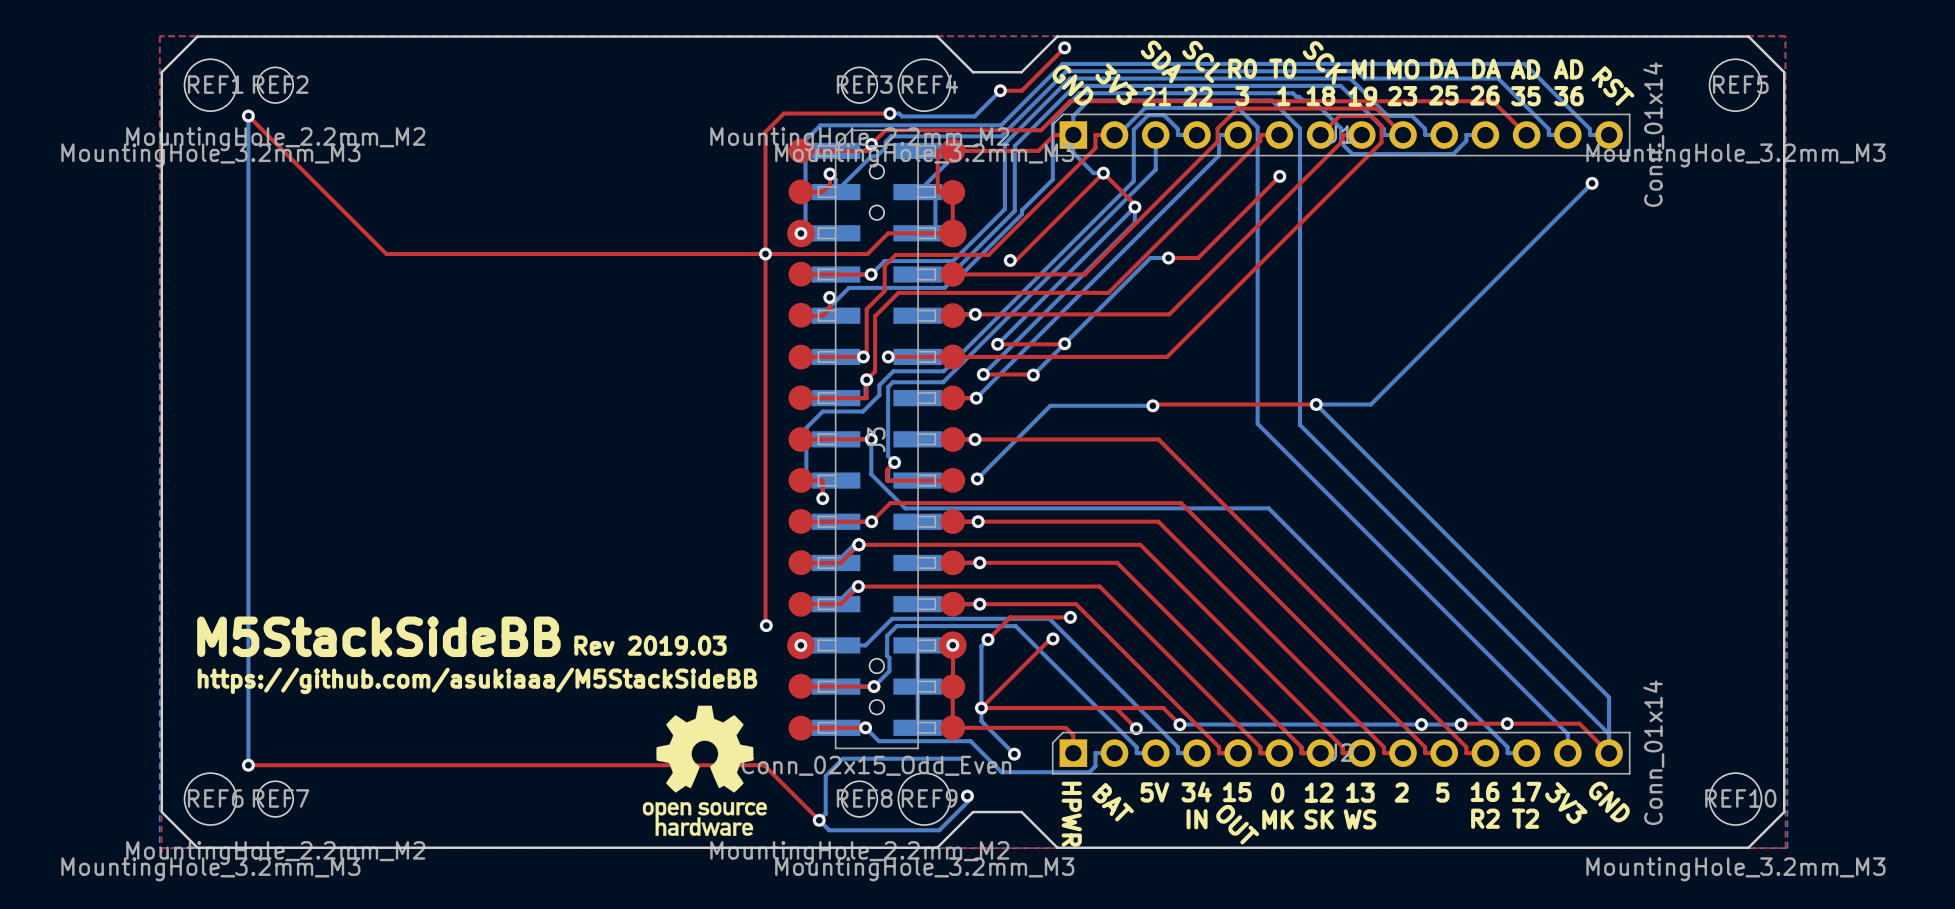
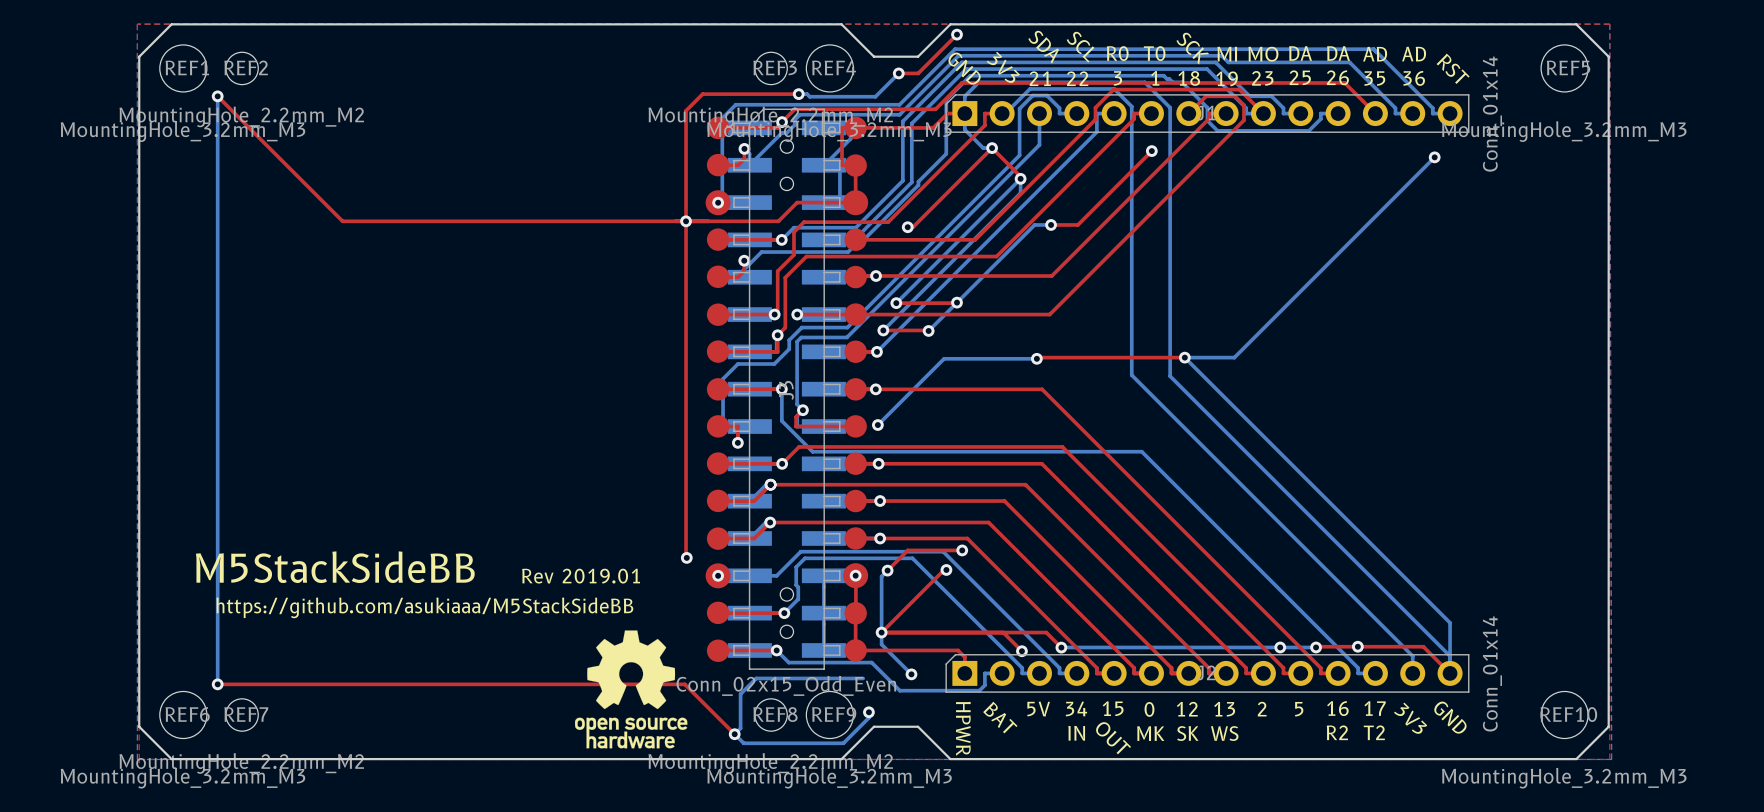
text: Rev 2019.03 (650, 645) -> Rev 2019.01 (581, 576)

